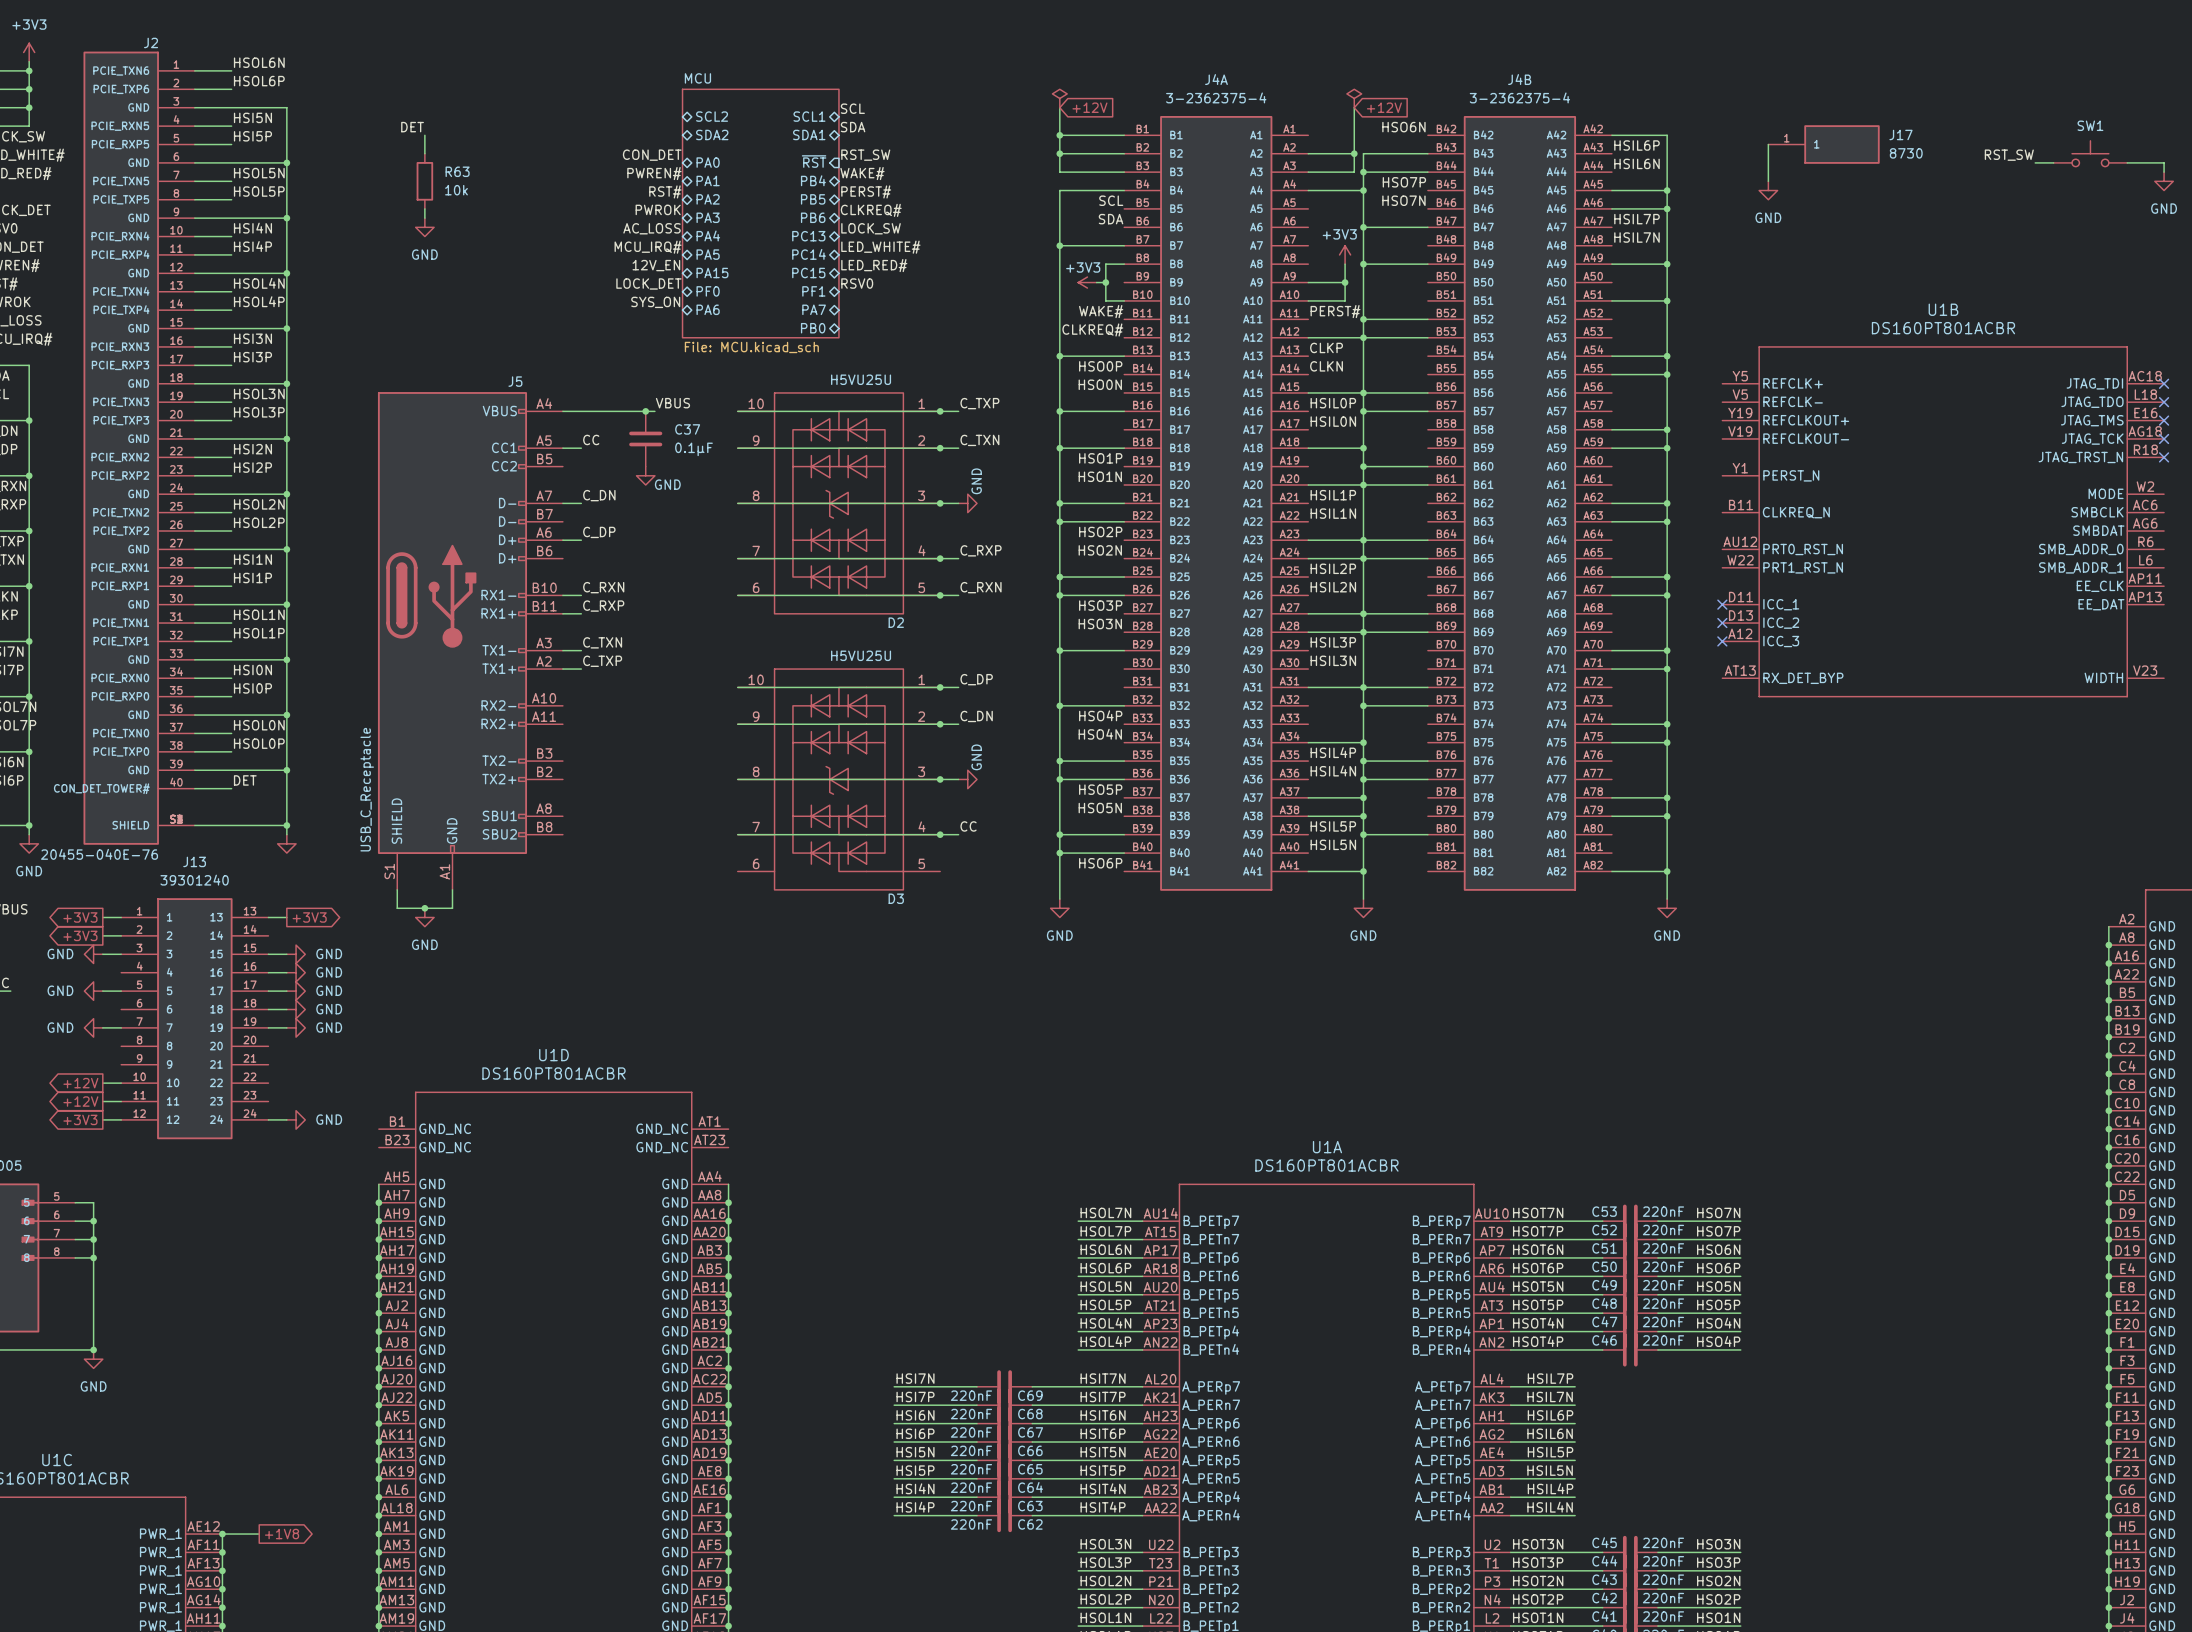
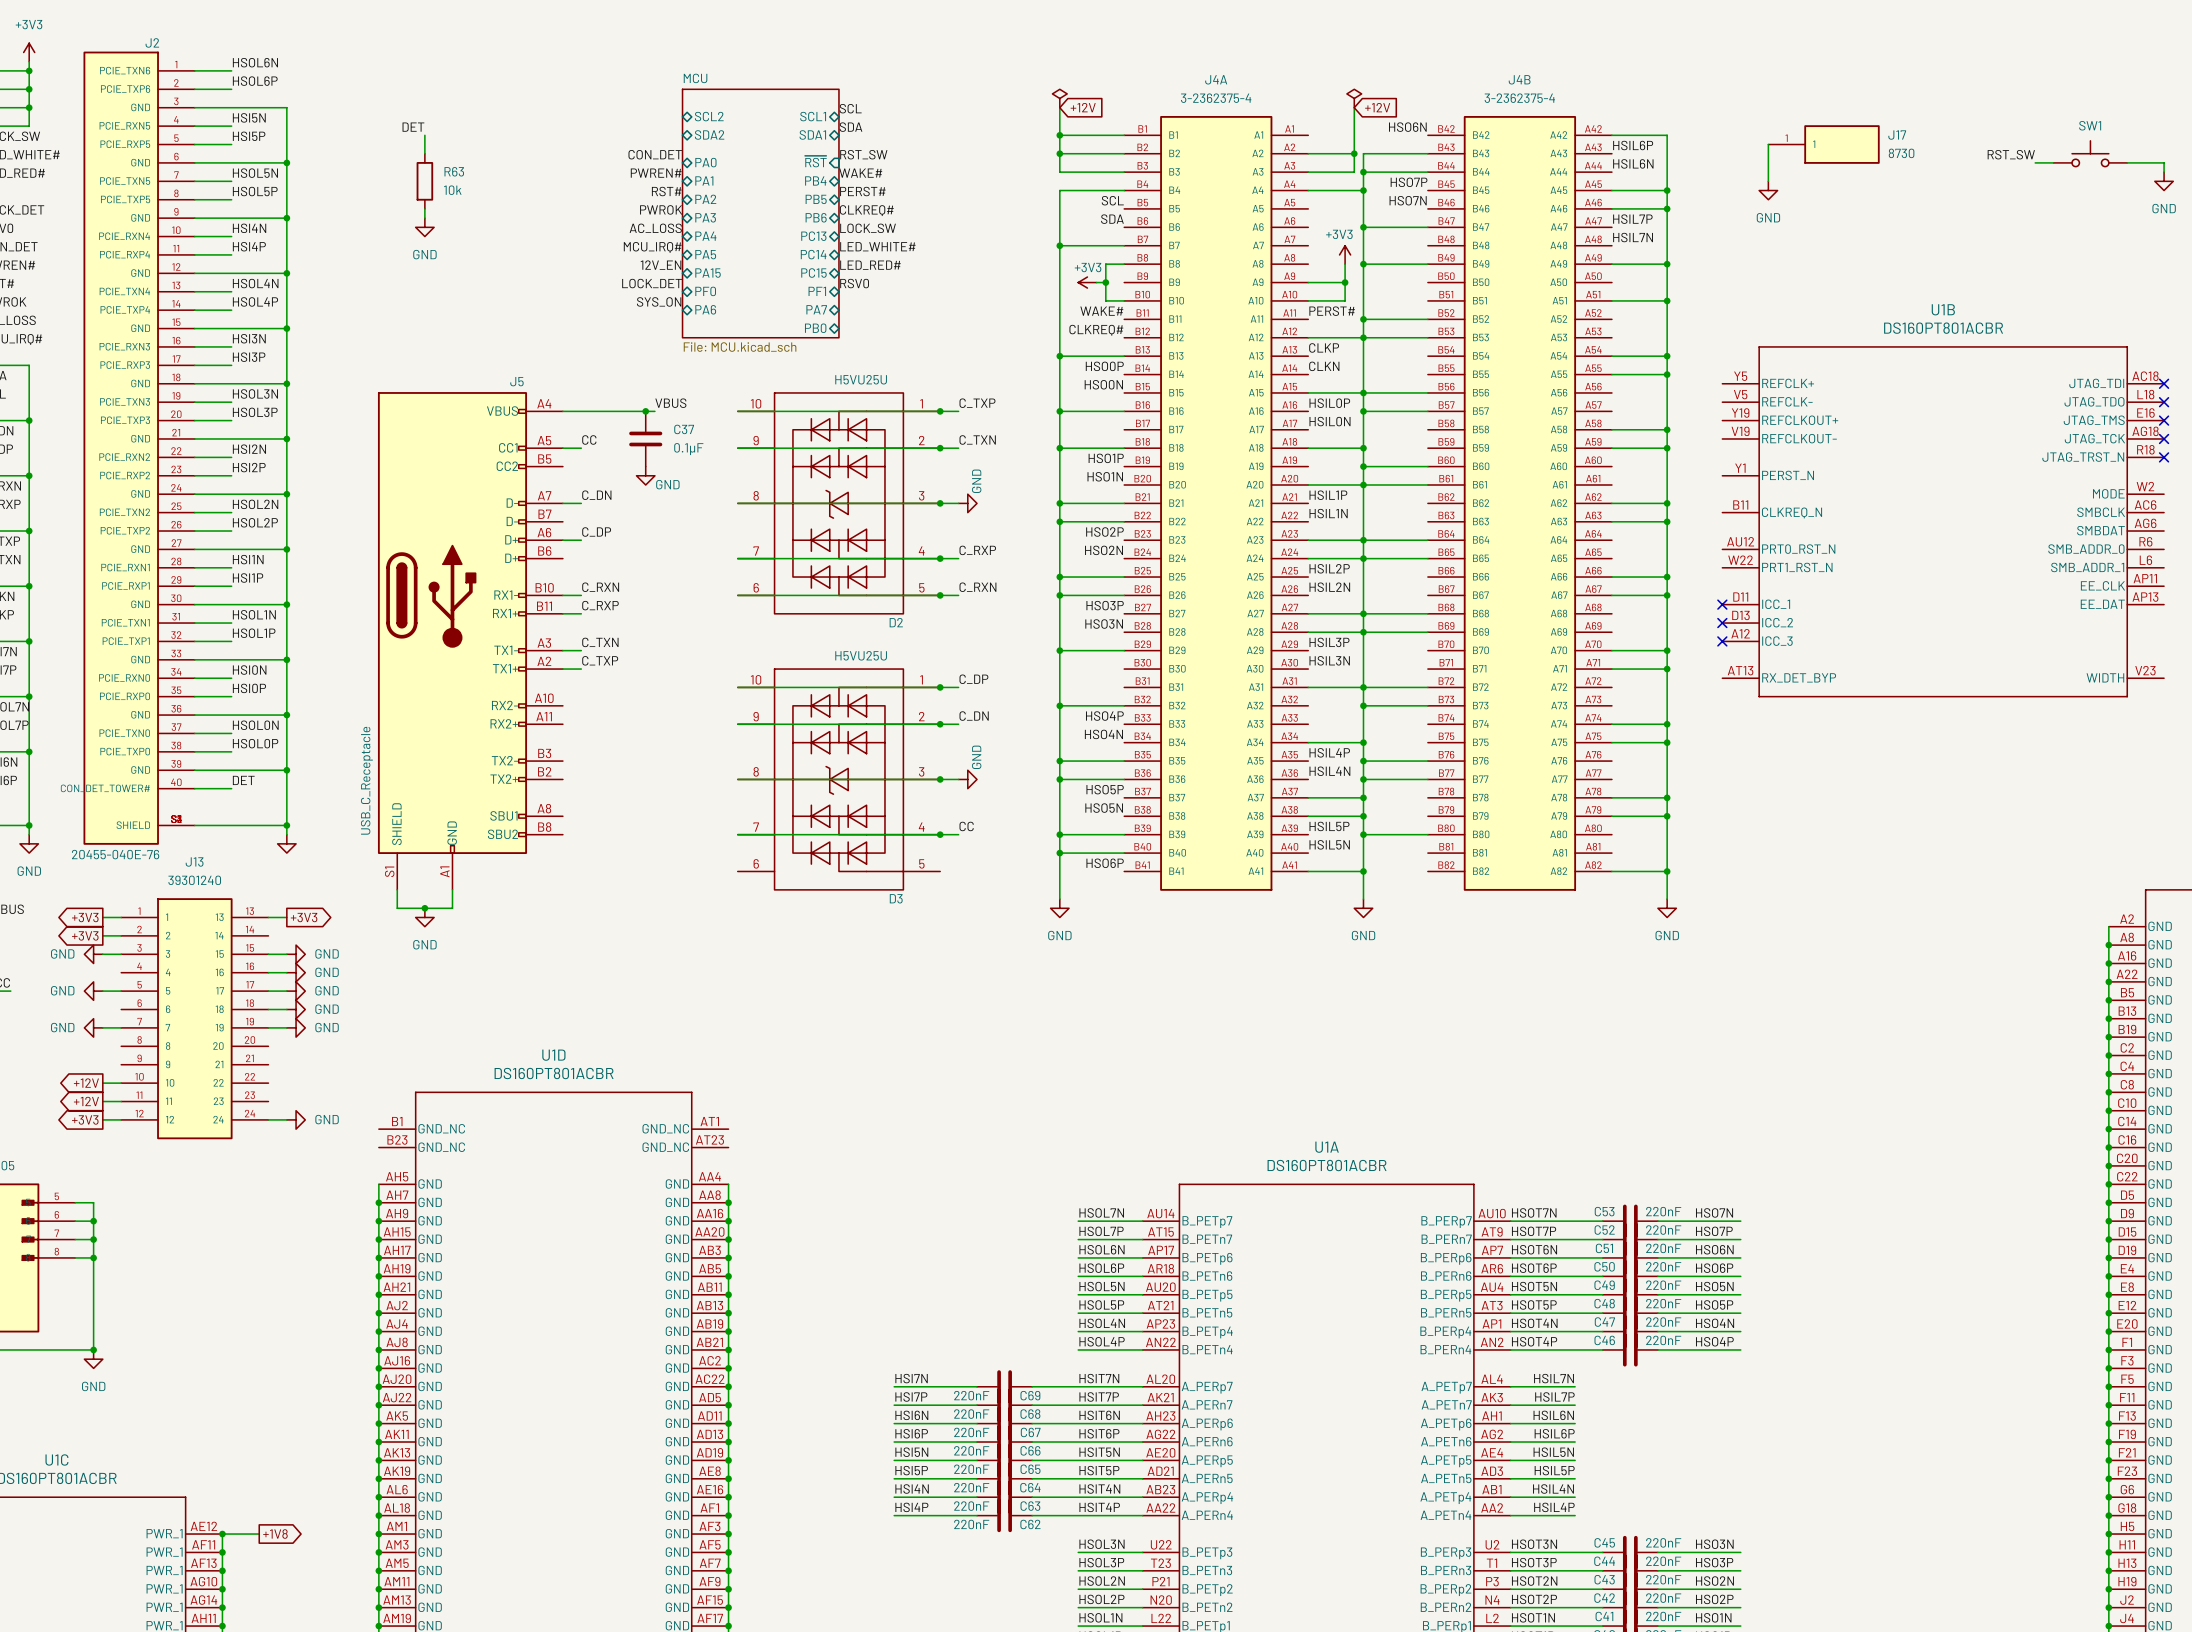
label: HSIL7P (1550, 1378) -> HSIL7N (1554, 1378)
label: HSIL7N (1550, 1396) -> HSIL7P (1554, 1396)
label: HSIL6P (1550, 1415) -> HSIL6N (1553, 1415)
label: HSIL6N (1550, 1433) -> HSIL6P (1554, 1433)
label: HSIL5P (1550, 1452) -> HSIL5N (1553, 1452)
label: HSIL5N (1550, 1470) -> HSIL5P (1554, 1470)
label: HSIL4P (1550, 1488) -> HSIL4N (1553, 1489)
label: HSIL4N (1550, 1507) -> HSIL4P (1554, 1507)

